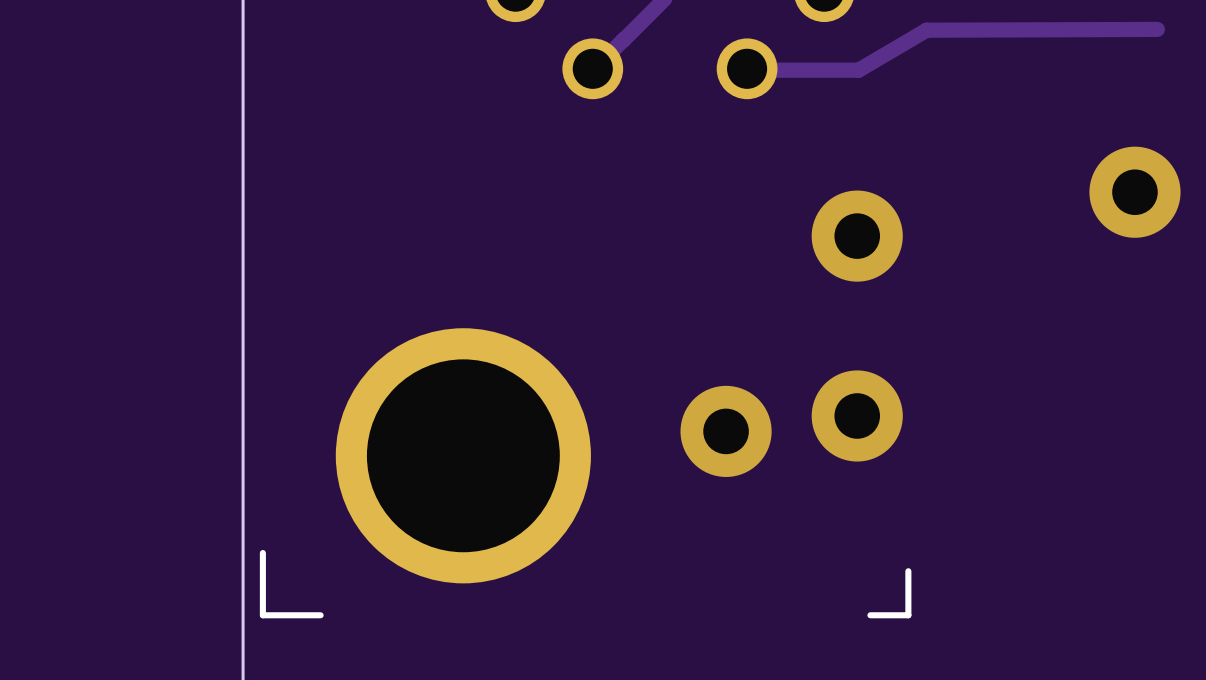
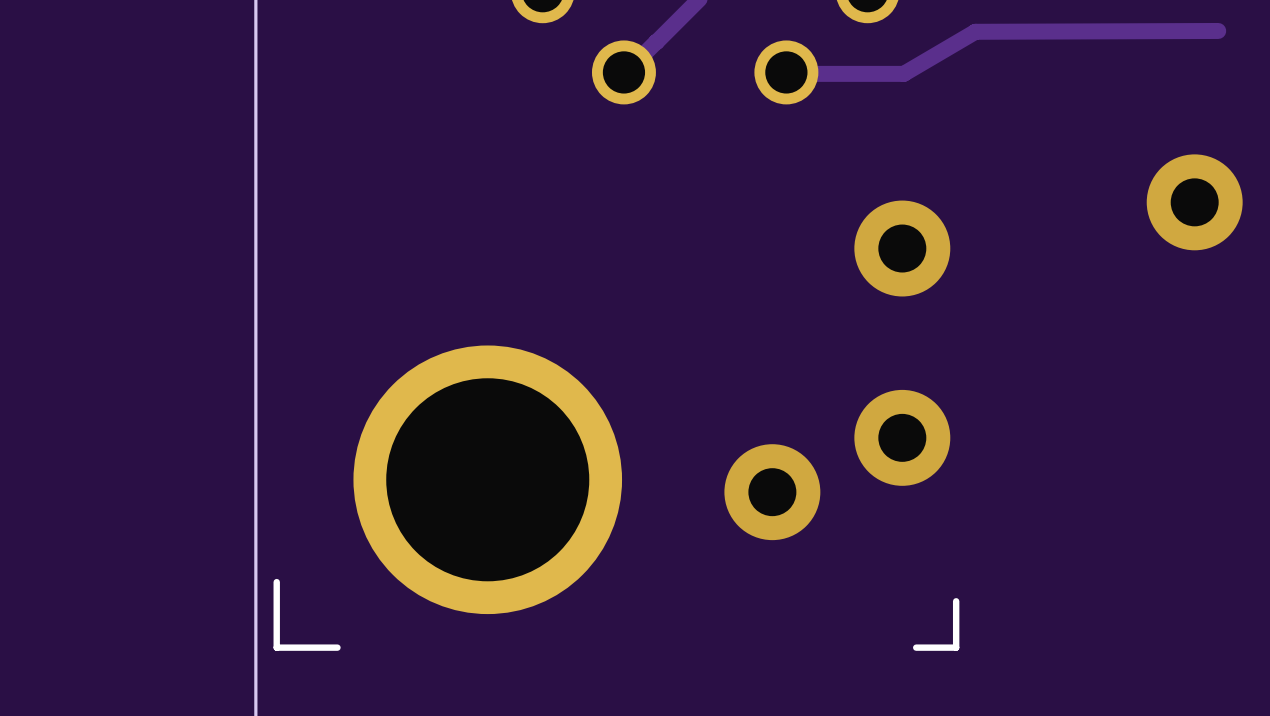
via position: (726, 431) -> (772, 492)

